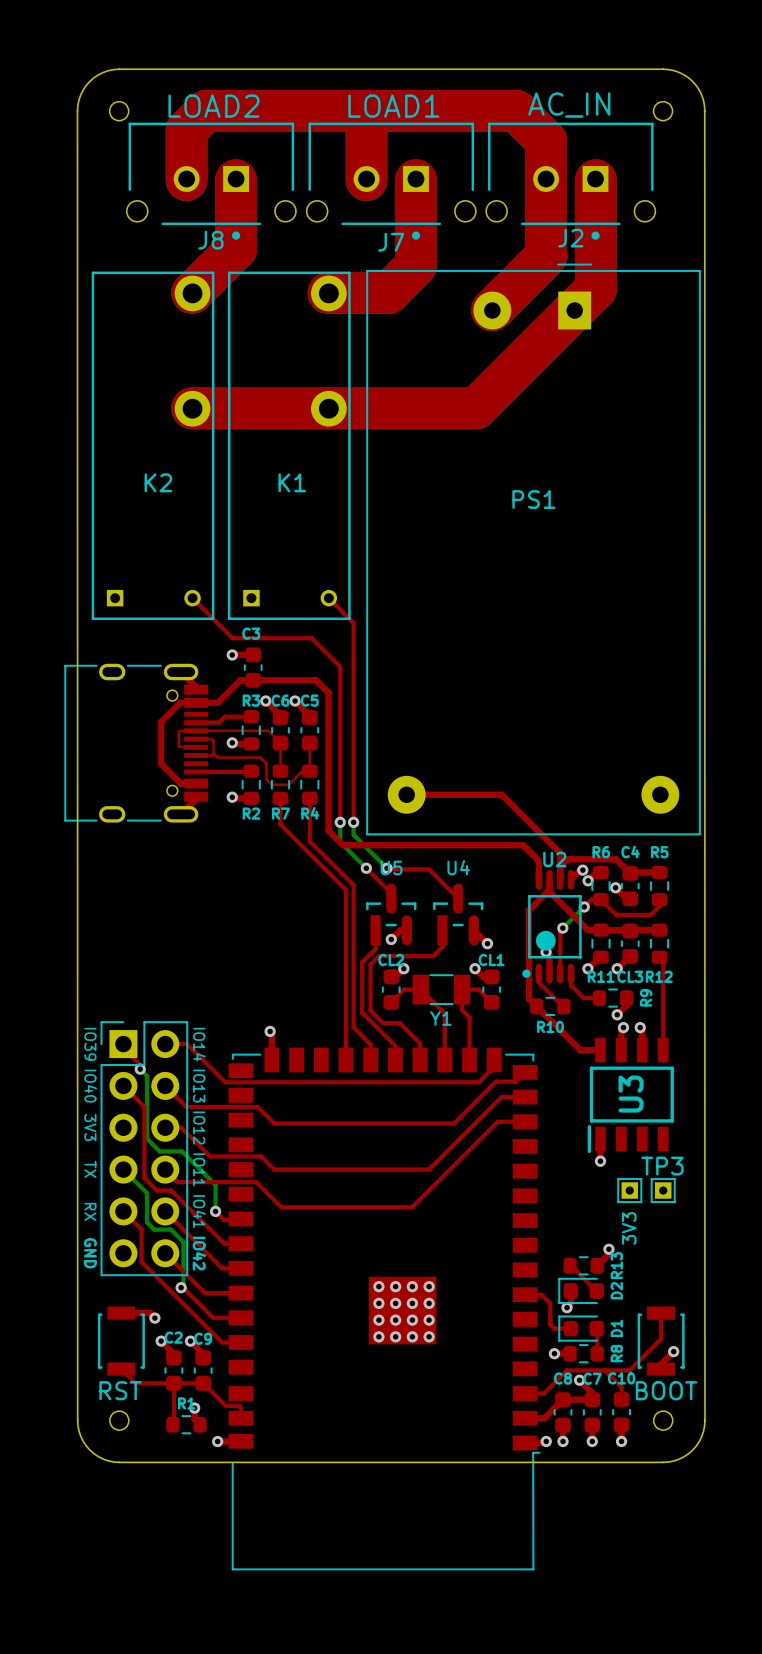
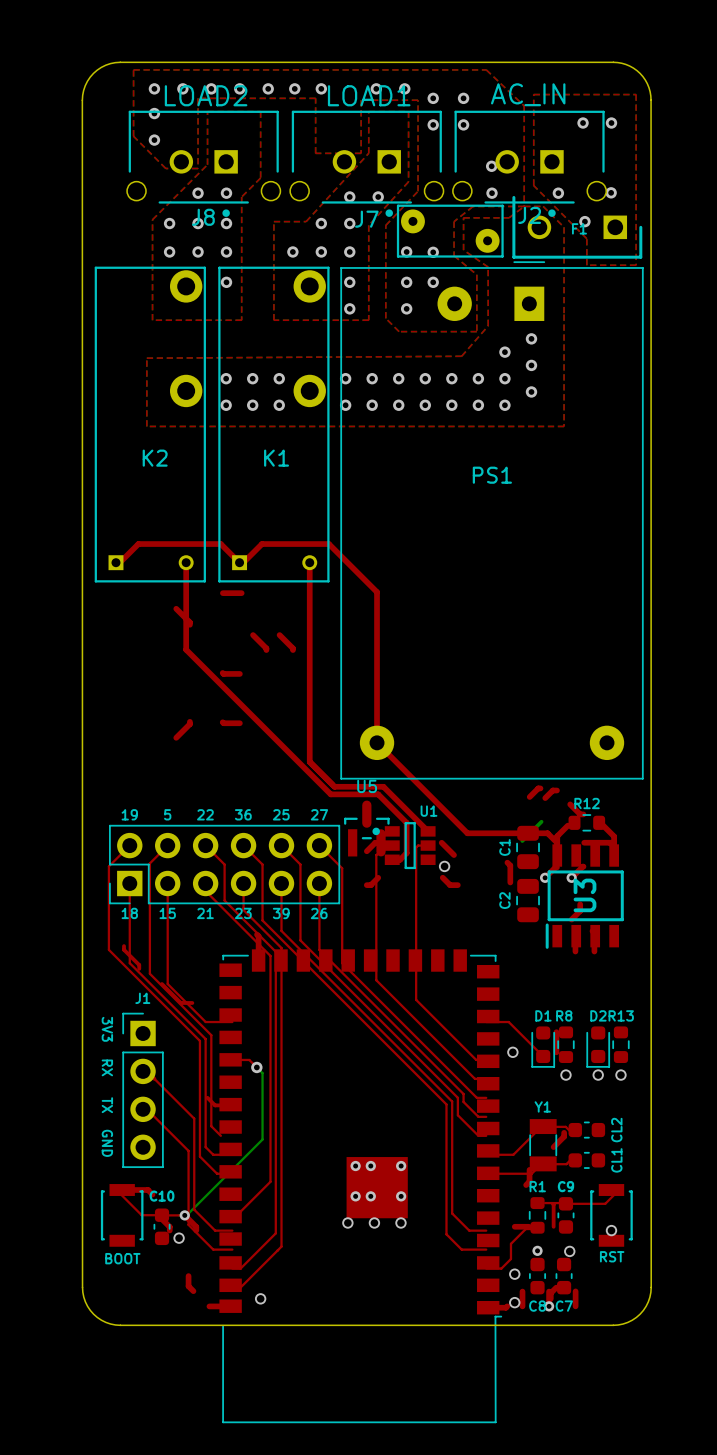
top zone outline: none -> (133, 69) (133, 136) (165, 168) (198, 168) (198, 98) (315, 98) (315, 153) (361, 153) (361, 100) (418, 100) (418, 191) (385, 225) (385, 318) (399, 331) (476, 331) (476, 274) (454, 255) (454, 221) (473, 206) (543, 206) (564, 227) (564, 426) (146, 426) (146, 358) (461, 356) (488, 325) (488, 267) (463, 250) (463, 217) (509, 217) (524, 206) (524, 105) (486, 69) (133, 69)
via: none -> (154, 88)
via: none -> (182, 88)
via: none -> (211, 88)
via: none -> (239, 88)
via: none -> (268, 88)
via: none -> (294, 88)
via: none -> (321, 88)
via: none -> (376, 88)
via: none -> (404, 88)
round board edge: [109, 101, 129, 121] -> none
round board edge: [653, 101, 673, 121] -> none
top zone outline: none -> (533, 94) (533, 185) (586, 238) (586, 265) (636, 265) (636, 94) (533, 94)
via: none -> (433, 98)
via: none -> (463, 98)
top track: (366, 110) (366, 180) -> none
top zone outline: none -> (207, 111) (207, 164) (152, 219) (152, 320) (241, 320) (241, 196) (260, 178) (260, 111) (207, 111)
top zone outline: none -> (368, 111) (408, 111) (408, 181) (368, 225) (368, 320) (273, 320) (273, 221) (306, 221) (368, 153) (368, 111)
via: none -> (154, 113)
via: none -> (583, 123)
via: none -> (611, 123)
via: none -> (433, 124)
via: none -> (463, 124)
via: none -> (154, 140)
top track: (186, 180) (186, 130) (205, 110) (516, 110) (546, 140) (546, 255) (492, 309) -> none
top track: (236, 180) (236, 248) (192, 292) -> none
top track: (415, 180) (415, 265) (388, 292) (328, 292) -> none
top track: (595, 180) (595, 288) (476, 408) (192, 408) -> none
via: none -> (491, 166)
via: none -> (198, 193)
via: none -> (226, 193)
via: none -> (492, 193)
via: none -> (558, 193)
via: none -> (611, 192)
via: none -> (349, 196)
via: none -> (378, 196)
via: none -> (584, 221)
via: none -> (169, 223)
via: none -> (198, 223)
via: none -> (226, 223)
via: none -> (321, 223)
via: none -> (349, 223)
F1: none -> (577, 227)
part: none -> (450, 231)
via: none -> (169, 251)
via: none -> (198, 251)
via: none -> (226, 251)
via: none -> (292, 251)
via: none -> (321, 251)
via: none -> (349, 251)
via: none -> (406, 251)
via: none -> (433, 252)
via: none -> (226, 282)
via: none -> (349, 282)
via: none -> (406, 282)
via: none -> (433, 282)
via: none -> (349, 308)
via: none -> (406, 308)
via: none -> (531, 338)
via: none -> (504, 352)
via: none -> (531, 365)
via: none -> (226, 378)
via: none -> (252, 378)
via: none -> (279, 378)
via: none -> (345, 378)
via: none -> (372, 378)
via: none -> (398, 378)
via: none -> (425, 378)
via: none -> (451, 378)
via: none -> (478, 378)
via: none -> (504, 378)
via: none -> (531, 391)
K2 position: (153, 445) -> (150, 424)
K1 position: (289, 445) -> (273, 424)
via: none -> (226, 405)
via: none -> (252, 405)
via: none -> (279, 405)
via: none -> (345, 405)
via: none -> (372, 405)
via: none -> (398, 405)
via: none -> (425, 405)
via: none -> (451, 405)
via: none -> (478, 405)
via: none -> (504, 405)
PS1 position: (533, 549) -> (492, 520)
top track: (192, 598) (232, 638) (311, 638) (340, 666) (340, 822) -> none
top track: (328, 598) (353, 622) (353, 822) -> none
top track: none -> (115, 566) (138, 544) (220, 544) (239, 562) (239, 566) (262, 544) (328, 544) (377, 592) (377, 742) (467, 833) (547, 833) (557, 842)
top track: none -> (186, 566) (186, 649) (330, 794) (378, 794) (406, 822) (406, 853) (400, 859) (392, 859)
top track: none -> (309, 566) (309, 761) (334, 786) (383, 786) (428, 831)
via: (232, 654) -> none
C3: (253, 667) -> none
via: (265, 701) -> none
via: (295, 701) -> none
top track: (251, 716) (224, 716) (219, 722) (196, 722) -> none
R3: (251, 730) -> none
C6: (280, 730) -> none
C5: (309, 730) -> none
top track: (196, 739) (213, 740) (212, 755) (196, 755) -> none
top track: (309, 741) (309, 771) (302, 771) (288, 784) (271, 784) (266, 779) (266, 763) (260, 757) (217, 757) (213, 753) -> none
via: (232, 742) -> none
part: (136, 743) -> none
top track: (195, 746) (179, 746) (178, 732) (268, 730) (280, 743) (280, 769) -> none
top track: (251, 771) (196, 772) -> none
top track: (196, 783) (180, 783) (161, 763) (161, 721) (180, 702) (217, 702) (240, 680) (316, 680) (328, 692) (328, 830) (343, 845) (523, 845) (538, 860) (538, 879) -> none
R2: (251, 784) -> none
R7: (280, 784) -> none
R4: (309, 784) -> none
top track: (406, 794) (501, 794) (560, 853) (560, 879) -> none
via: (232, 797) -> none
top track: (280, 798) (280, 824) (346, 890) (346, 1059) -> none
top track: (309, 798) (309, 841) (353, 885) (353, 1027) (370, 1044) (370, 1059) -> none
bottom track: (340, 822) (340, 842) (366, 868) -> none
via: (340, 822) -> none
bottom track: (353, 822) (353, 834) (387, 868) -> none
via: (353, 822) -> none
top track: (560, 866) (567, 859) (616, 859) (630, 873) -> none
top track: (366, 868) (391, 893) (391, 898) -> none
via: (366, 868) -> none
top track: (387, 868) (429, 869) (458, 898) -> none
via: (387, 868) -> none
via: (582, 870) -> none
top track: (659, 872) (630, 873) -> none
top track: (549, 879) (549, 891) (587, 930) (629, 930) -> none
via: (588, 880) -> none
R6: (600, 886) -> none
C4: (630, 886) -> none
R5: (659, 886) -> none
via: (615, 887) -> none
top track: (549, 889) (528, 910) (528, 998) (580, 1050) (600, 1050) -> none
text: none -> 19 (129, 814)
text: none -> 5 (167, 814)
text: none -> 22 (205, 814)
text: none -> 36 (243, 814)
text: none -> 25 (281, 814)
text: none -> 27 (319, 814)
top track: (659, 899) (659, 906) (650, 914) (616, 914) (600, 899) (591, 899) (584, 906) -> none
via: (584, 906) -> none
top track: none -> (600, 822) (614, 836) (614, 855)
top track: none -> (567, 825) (557, 836) (557, 855)
U4: (458, 914) -> none
U2: (552, 926) -> none
top track: (562, 928) (560, 930) (560, 973) -> none
via: (562, 928) -> none
top track: (375, 929) (375, 948) (362, 962) (362, 1012) (395, 1045) (395, 1059) -> none
top track: (442, 930) (442, 946) (433, 956) (378, 956) (370, 964) (370, 1010) (383, 1023) (399, 1023) (420, 1043) (420, 1059) -> none
top track: none -> (129, 845) (108, 866) (108, 949) (199, 1040) (199, 1156) (217, 1173) (232, 1173)
top track: none -> (167, 845) (149, 863) (149, 973) (211, 1035) (211, 1126) (220, 1135)
top track: none -> (205, 845) (224, 864) (224, 900) (275, 951) (275, 1233) (240, 1268) (232, 1268)
top track: none -> (243, 845) (262, 864) (262, 920) (446, 1104) (446, 1234) (461, 1249) (486, 1249)
top track: none -> (281, 845) (300, 864) (300, 940) (457, 1097) (457, 1115) (478, 1135) (486, 1135)
top track: none -> (319, 845) (342, 868) (342, 963) (476, 1097) (486, 1097)
top track: none -> (392, 845) (385, 845) (376, 855) (376, 980) (475, 1078) (486, 1078)
U1: none -> (404, 845)
top track: none -> (428, 845) (418, 845) (416, 847) (416, 999) (476, 1059) (486, 1059)
C1: none -> (528, 847)
via: (391, 939) -> none
via: (487, 943) -> none
R11: (600, 943) -> none
CL3: (630, 943) -> none
R12 rotation: 0° (659, 943) -> 90° clockwise (586, 822)
R12 position: (659, 943) -> (586, 822)
via: (546, 952) -> none
via: none -> (444, 866)
top track: (659, 957) (663, 960) (663, 1050) -> none
via: (403, 968) -> none
via: (475, 968) -> none
top track: (538, 973) (538, 982) (563, 1006) -> none
top track: (570, 973) (570, 985) (583, 998) (599, 998) -> none
top track: none -> (129, 883) (129, 963) (205, 1039) (205, 1147) (213, 1154) (232, 1154)
top track: none -> (167, 883) (167, 984) (205, 1022) (232, 1022)
top track: none -> (205, 883) (205, 891) (270, 955) (270, 1181) (240, 1211) (232, 1211)
top track: none -> (243, 883) (243, 910) (281, 947) (281, 1246) (240, 1287) (232, 1287)
top track: none -> (281, 883) (281, 930) (452, 1101) (452, 1213) (469, 1230) (486, 1230)
top track: none -> (319, 883) (319, 949) (463, 1094) (463, 1101) (478, 1116) (486, 1116)
R12 name position: R12 (659, 976) -> R12 (587, 803)
CL2 rotation: 0° (391, 989) -> 90° clockwise (586, 1130)
CL2 position: (391, 989) -> (586, 1130)
Y1 rotation: 0° (441, 989) -> 90° clockwise (543, 1145)
Y1 position: (441, 989) -> (543, 1145)
CL1 rotation: 0° (491, 989) -> 90° clockwise (586, 1160)
CL1 position: (491, 989) -> (586, 1160)
R9: (613, 998) -> none
top track: (391, 1002) (404, 989) (420, 989) (444, 1013) (444, 1059) -> none
top track: (491, 1002) (478, 989) (462, 989) (462, 1009) (469, 1017) (469, 1059) -> none
R10: (550, 1006) -> none
text: none -> 18 (129, 913)
text: none -> 15 (167, 913)
text: none -> 21 (205, 913)
text: none -> 23 (243, 913)
text: none -> 39 (281, 913)
text: none -> 26 (319, 913)
via: (617, 1014) -> none
Y1 name position: Y1 (440, 1018) -> Y1 (542, 1106)
via: (623, 1027) -> none
via: (640, 1027) -> none
via: (270, 1031) -> none
text: IO39 (90, 1044) -> none
top track: (165, 1044) (187, 1044) (225, 1082) (478, 1082) (494, 1066) (494, 1059) (491, 1062) -> none
text: IO14 (199, 1044) -> none
bottom track: (140, 1069) (147, 1076) (147, 1138) (159, 1151) (182, 1151) (215, 1184) (215, 1211) -> none
via: (140, 1069) -> none
top track: (525, 1072) (515, 1081) (496, 1081) (454, 1123) (274, 1123) (257, 1106) (198, 1106) -> none
top track: (123, 1085) (144, 1106) (144, 1177) -> none
text: IO40 (90, 1086) -> none
text: IO13 (199, 1086) -> none
U3 position: (630, 1095) -> (584, 896)
top track: (525, 1097) (501, 1097) (429, 1169) (274, 1169) (261, 1156) (210, 1156) (181, 1127) (165, 1127) -> none
top track: (525, 1121) (497, 1121) (412, 1207) (281, 1207) (256, 1182) (177, 1182) (165, 1169) -> none
text position: 3V3 (90, 1127) -> 3V3 (107, 1029)
top track: none -> (486, 1022) (508, 1022) (543, 1056)
text: IO12 (199, 1128) -> none
part rotation: 0° (144, 1148) -> 90° counterclockwise (224, 864)
part position: (144, 1148) -> (224, 864)
via: none -> (512, 1052)
via: (600, 1161) -> none
text position: TX (90, 1169) -> TX (107, 1105)
bottom track: (123, 1169) (147, 1193) (147, 1222) (154, 1229) (170, 1229) (183, 1242) (183, 1285) (181, 1287) -> none
text: IO11 (199, 1169) -> none
top track: none -> (232, 1059) (249, 1059) (256, 1067)
bottom track: none -> (256, 1067) (262, 1073) (262, 1139) (186, 1215) (179, 1215)
via: none -> (256, 1067)
via: none -> (565, 1075)
via: none -> (598, 1075)
via: none -> (620, 1075)
top track: (156, 1190) (171, 1190) (224, 1243) (241, 1243) -> (154, 1078) (194, 1118) (194, 1209) (215, 1230) (232, 1230)
part: 3V3 (629, 1190) -> none
TP3: (663, 1190) -> none
J1: none -> (143, 1090)
text position: RX (90, 1211) -> RX (107, 1067)
top track: (123, 1211) (141, 1229) (141, 1261) (222, 1342) (241, 1342) -> none
top track: (169, 1211) (165, 1211) (222, 1268) (241, 1268) -> none
text: IO41 (199, 1211) -> none
via: (215, 1211) -> none
top track: none -> (143, 1105) (188, 1150) (188, 1224) (213, 1249) (232, 1249)
via: (608, 1249) -> none
top track: none -> (571, 1132) (565, 1126) (541, 1126) (513, 1154) (486, 1154)
text position: GND (90, 1253) -> GND (107, 1143)
top track: (165, 1253) (205, 1293) (241, 1293) -> none
text: IO42 (199, 1253) -> none
top track: (570, 1265) (596, 1290) -> none
R13 rotation: 0° (583, 1265) -> 90° clockwise (620, 1044)
R13 position: (583, 1265) -> (620, 1044)
R13 name position: R13 (616, 1265) -> R13 (621, 1015)
top track: none -> (546, 1159) (531, 1173) (486, 1173)
top track: none -> (571, 1159) (566, 1164) (541, 1164)
via: (412, 1286) -> none
top track: (181, 1287) (213, 1317) (241, 1317) -> none
via: (181, 1287) -> none
D2 rotation: 0° (581, 1290) -> 90° counterclockwise (598, 1047)
D2 position: (581, 1290) -> (598, 1047)
top track: (525, 1294) (541, 1294) (550, 1303) (550, 1324) (554, 1328) (570, 1328) -> none
via: (378, 1303) -> none
via: (395, 1303) -> none
via: (412, 1303) -> none
via: (429, 1303) -> none
via: (567, 1307) -> none
top track: (661, 1313) (661, 1339) (629, 1370) (567, 1370) (543, 1393) (525, 1393) -> none
top track: none -> (120, 1193) (141, 1215) (162, 1215)
top track: none -> (615, 1193) (605, 1203) (545, 1203)
via: (154, 1318) -> none
via: (412, 1320) -> none
D1 rotation: 0° (581, 1328) -> 90° counterclockwise (543, 1047)
D1 position: (581, 1328) -> (543, 1047)
via: (378, 1336) -> none
via: (395, 1336) -> none
via: (412, 1336) -> none
via: (429, 1336) -> none
C2 name position: C2 (173, 1337) -> C2 (504, 900)
via: (161, 1341) -> none
top track: none -> (162, 1215) (179, 1215)
via: none -> (347, 1222)
via: none -> (374, 1222)
via: none -> (400, 1222)
C2 footprint: [164, 1350, 184, 1391] -> [516, 878, 540, 923]
top track: (673, 1351) (661, 1364) (661, 1369) -> none
via: (673, 1351) -> none
via: (554, 1353) -> none
R8 rotation: 0° (583, 1353) -> 90° clockwise (565, 1044)
R8 position: (583, 1353) -> (565, 1044)
R8 name position: R8 (616, 1353) -> R8 (564, 1015)
top track: none -> (537, 1229) (525, 1229) (510, 1243) (510, 1259) (501, 1268) (486, 1268)
via: none -> (611, 1230)
via: none -> (179, 1238)
top track: (121, 1369) (135, 1383) (203, 1383) (225, 1405) (239, 1405) (241, 1418) -> none
C9 position: (203, 1370) -> (565, 1215)
top track: (604, 1370) (621, 1387) (621, 1399) -> none
C8 name position: C8 (563, 1378) -> C8 (537, 1306)
C7 name position: C7 (592, 1378) -> C7 (564, 1306)
top track: (579, 1380) (592, 1392) (592, 1399) (563, 1399) (544, 1418) (525, 1418) -> none
via: none -> (569, 1251)
top track: (173, 1383) (172, 1424) -> none
part value: RST (120, 1390) -> BOOT (122, 1258)
part value: BOOT (666, 1390) -> RST (612, 1256)
via: none -> (514, 1274)
via: (194, 1408) -> none
round board edge: [109, 1410, 130, 1431] -> none
round board edge: [653, 1410, 673, 1431] -> none
C8 position: (563, 1412) -> (537, 1276)
C7 position: (592, 1412) -> (564, 1276)
C10 position: (621, 1412) -> (162, 1226)
top track: none -> (556, 1287) (550, 1293) (550, 1298)
R1 rotation: 0° (186, 1424) -> 90° clockwise (537, 1215)
R1 position: (186, 1424) -> (537, 1215)
via: none -> (260, 1298)
via: none -> (514, 1302)
via: (217, 1441) -> none
via: (546, 1441) -> none
via: (563, 1441) -> none
via: (621, 1441) -> none

